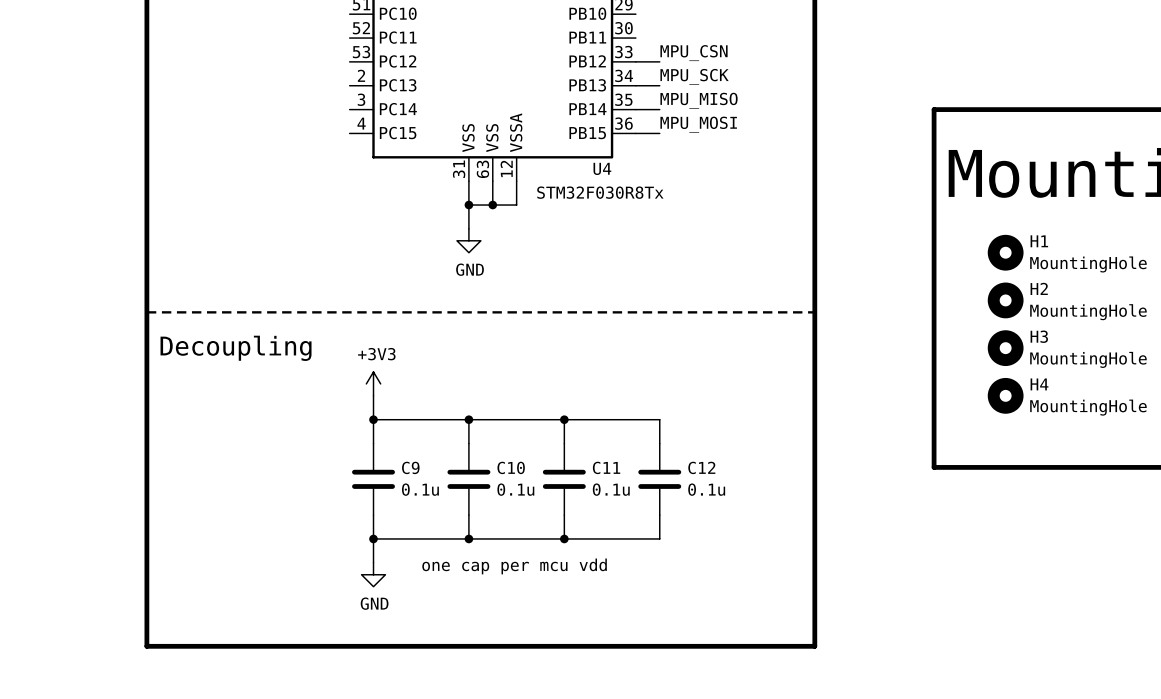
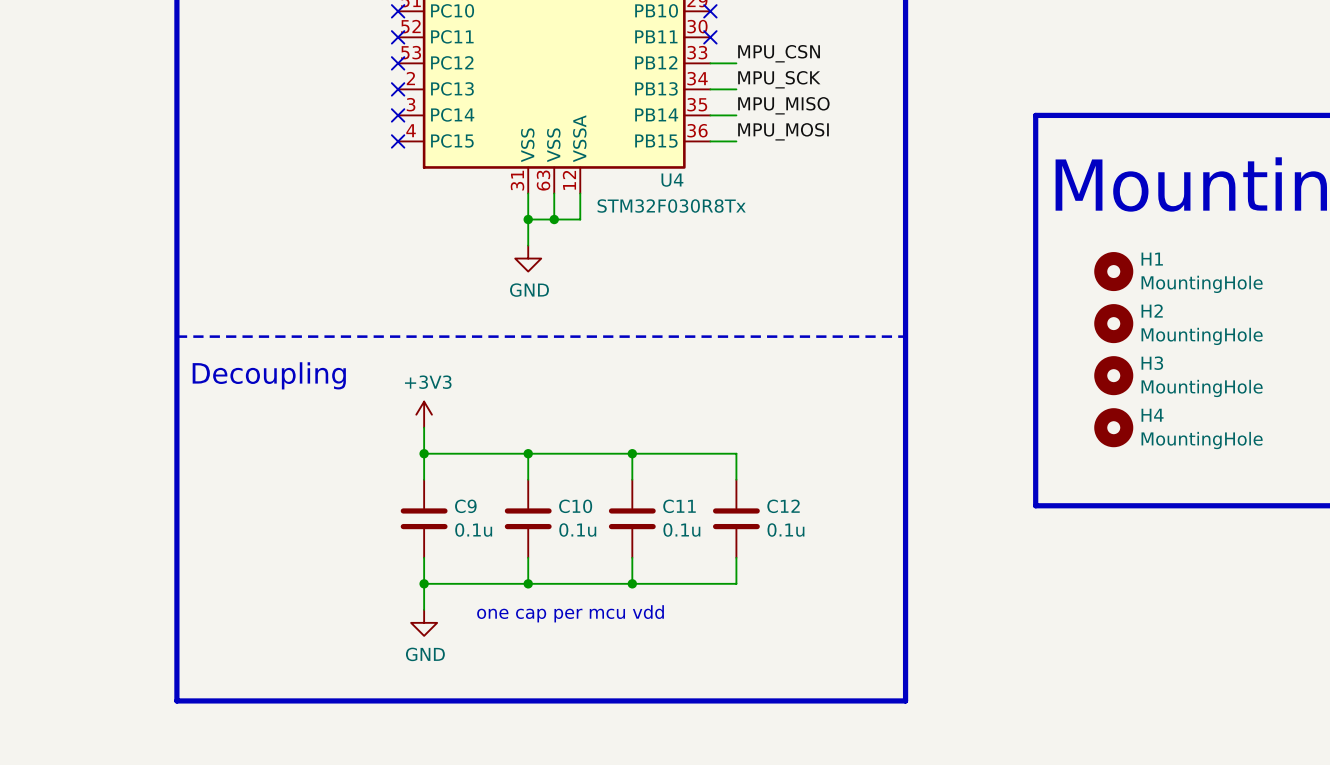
no-connect mark: none -> (398, 11)
no-connect mark: none -> (710, 11)
no-connect mark: none -> (398, 37)
no-connect mark: none -> (710, 37)
no-connect mark: none -> (398, 63)
no-connect mark: none -> (398, 89)
no-connect mark: none -> (398, 115)
no-connect mark: none -> (398, 141)

